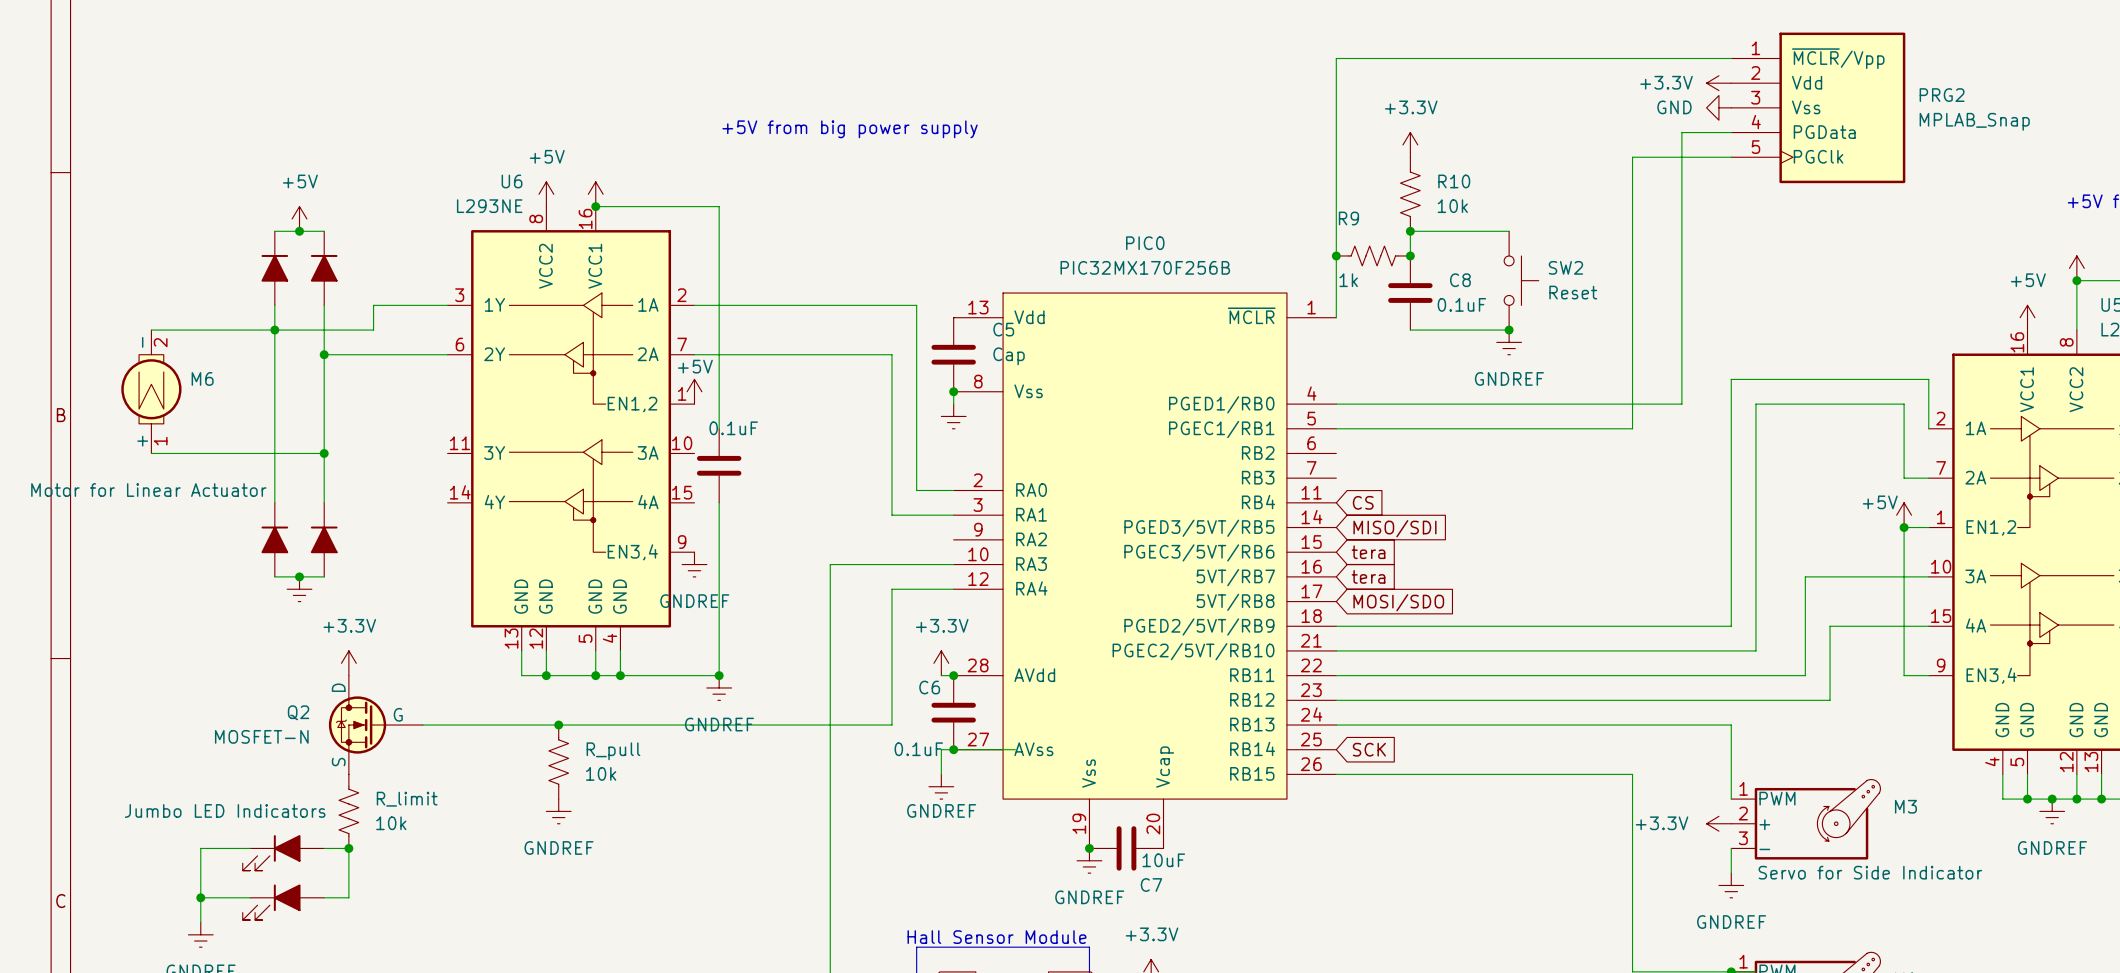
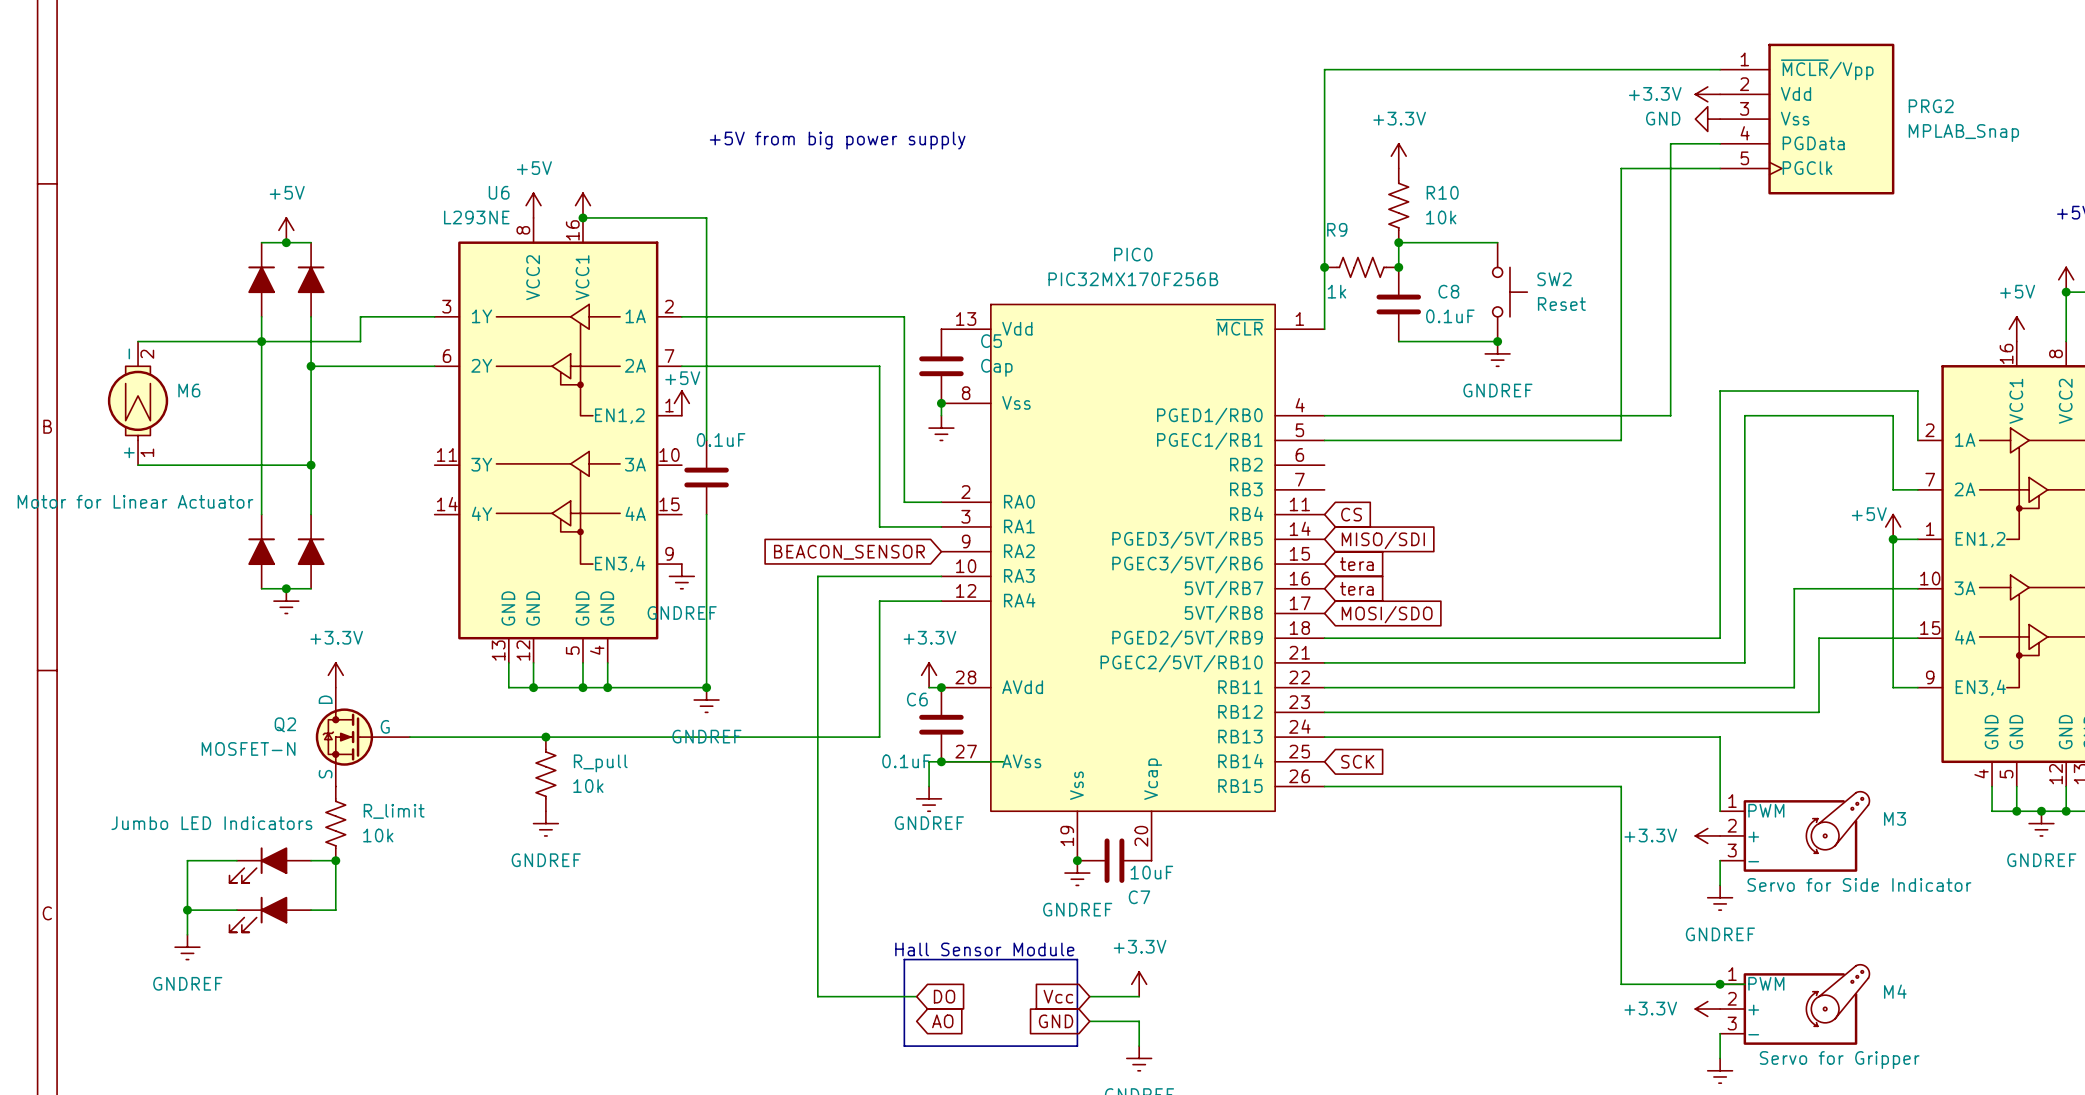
global label: none -> BEACON_SENSOR (849, 552)

